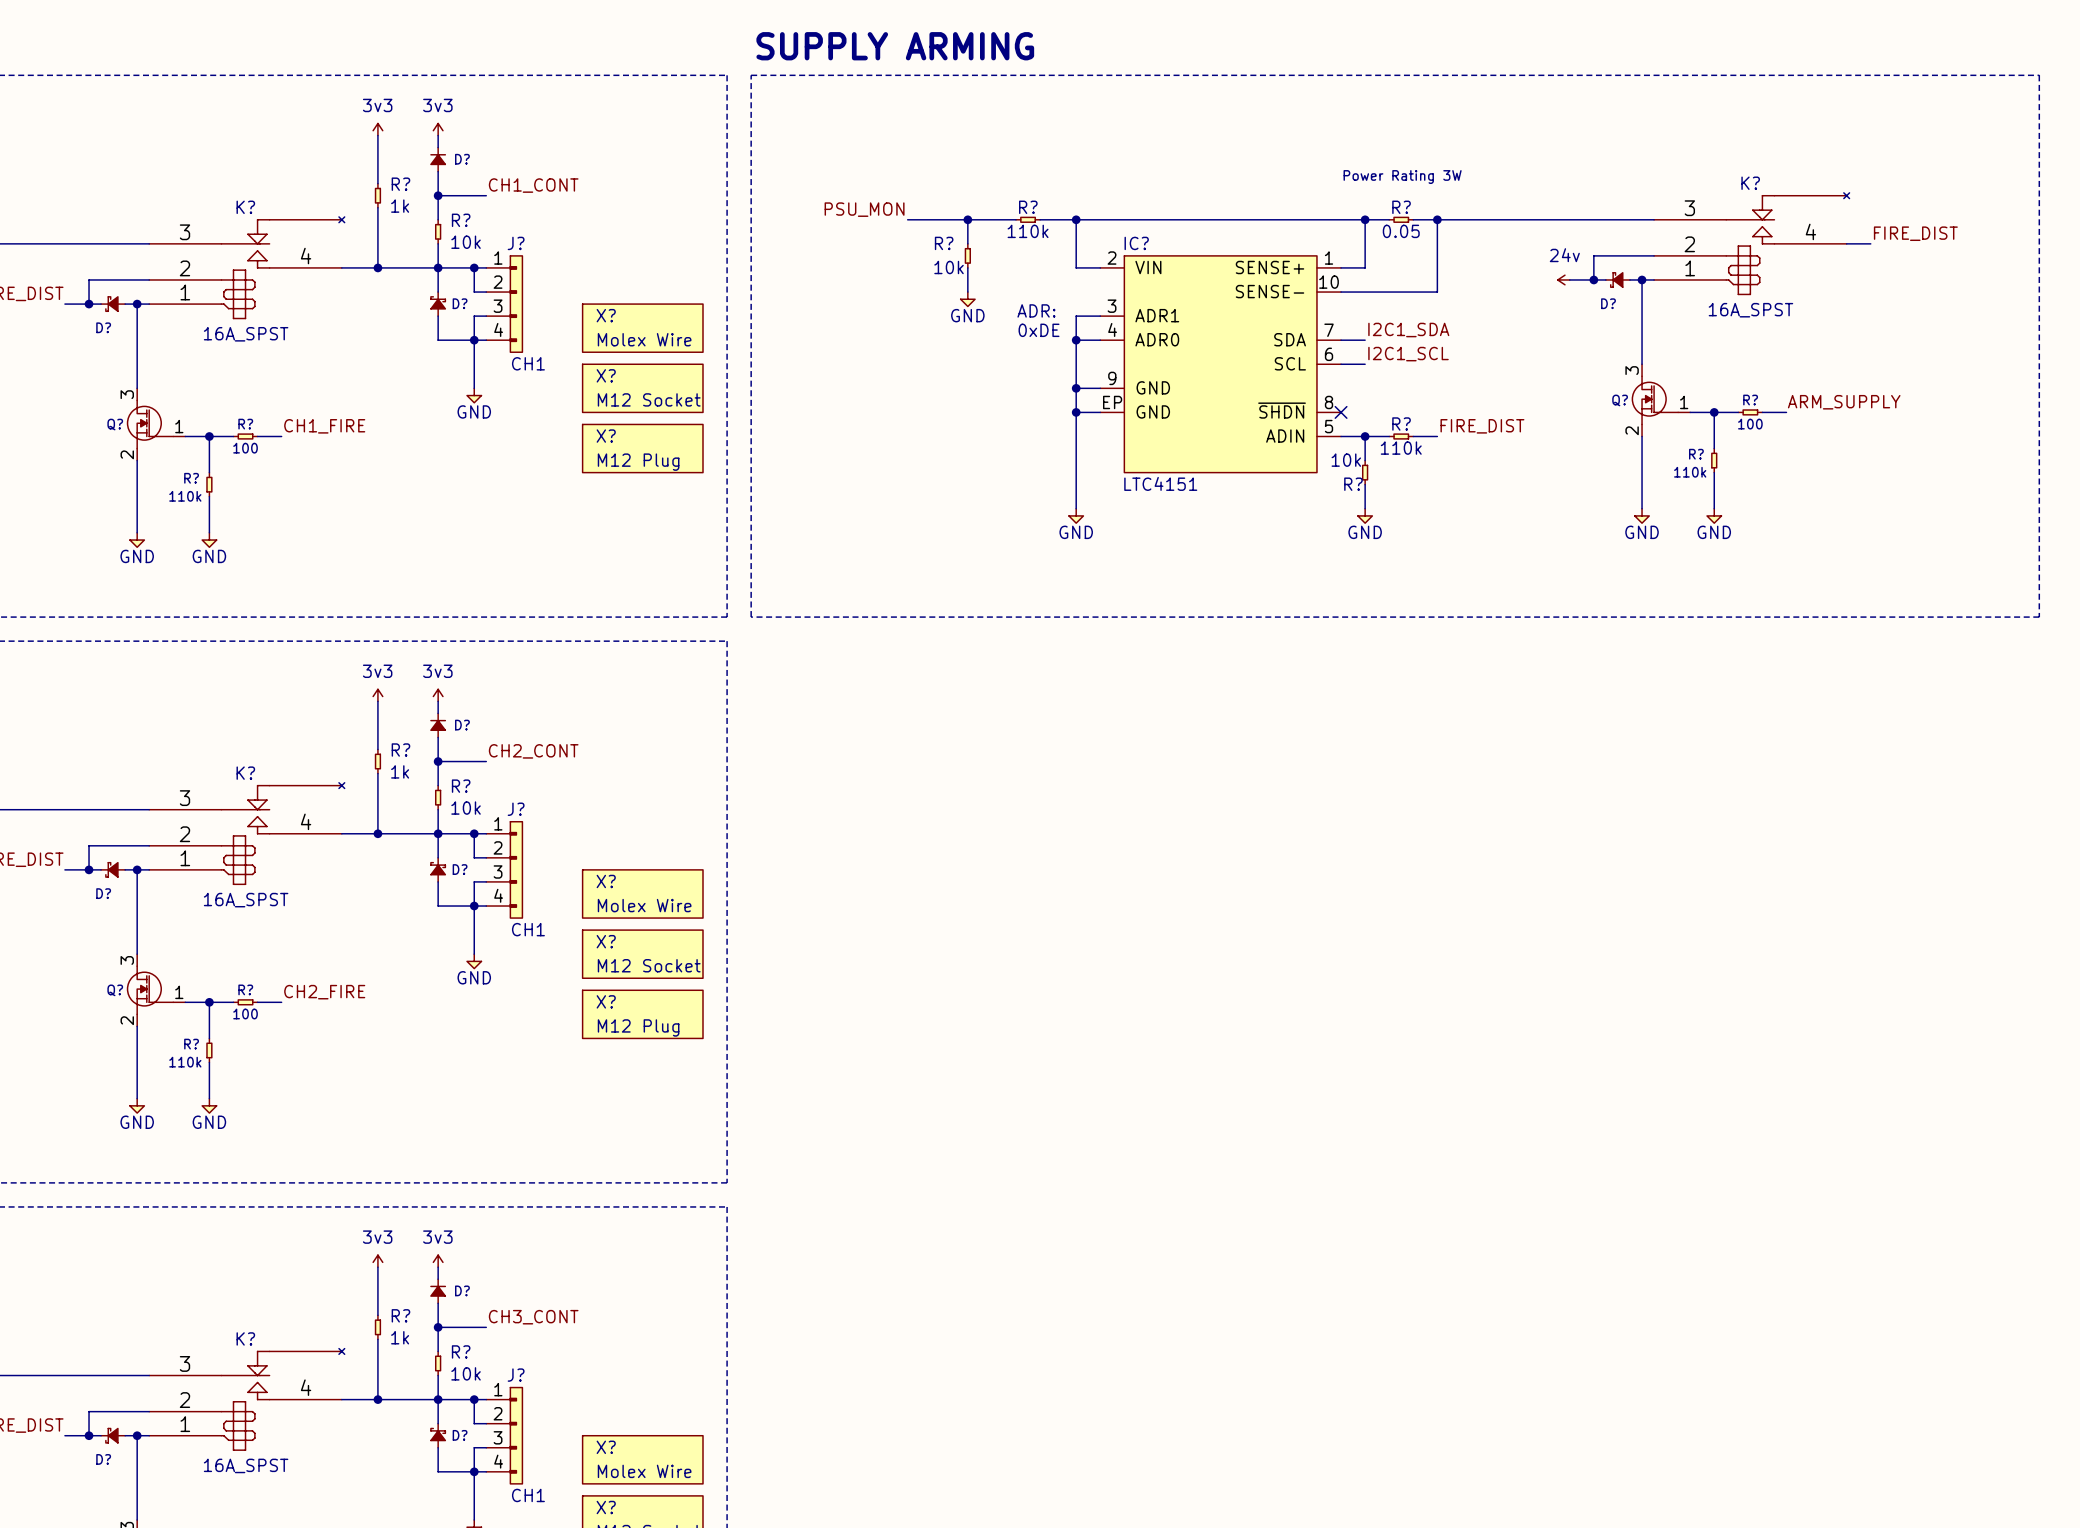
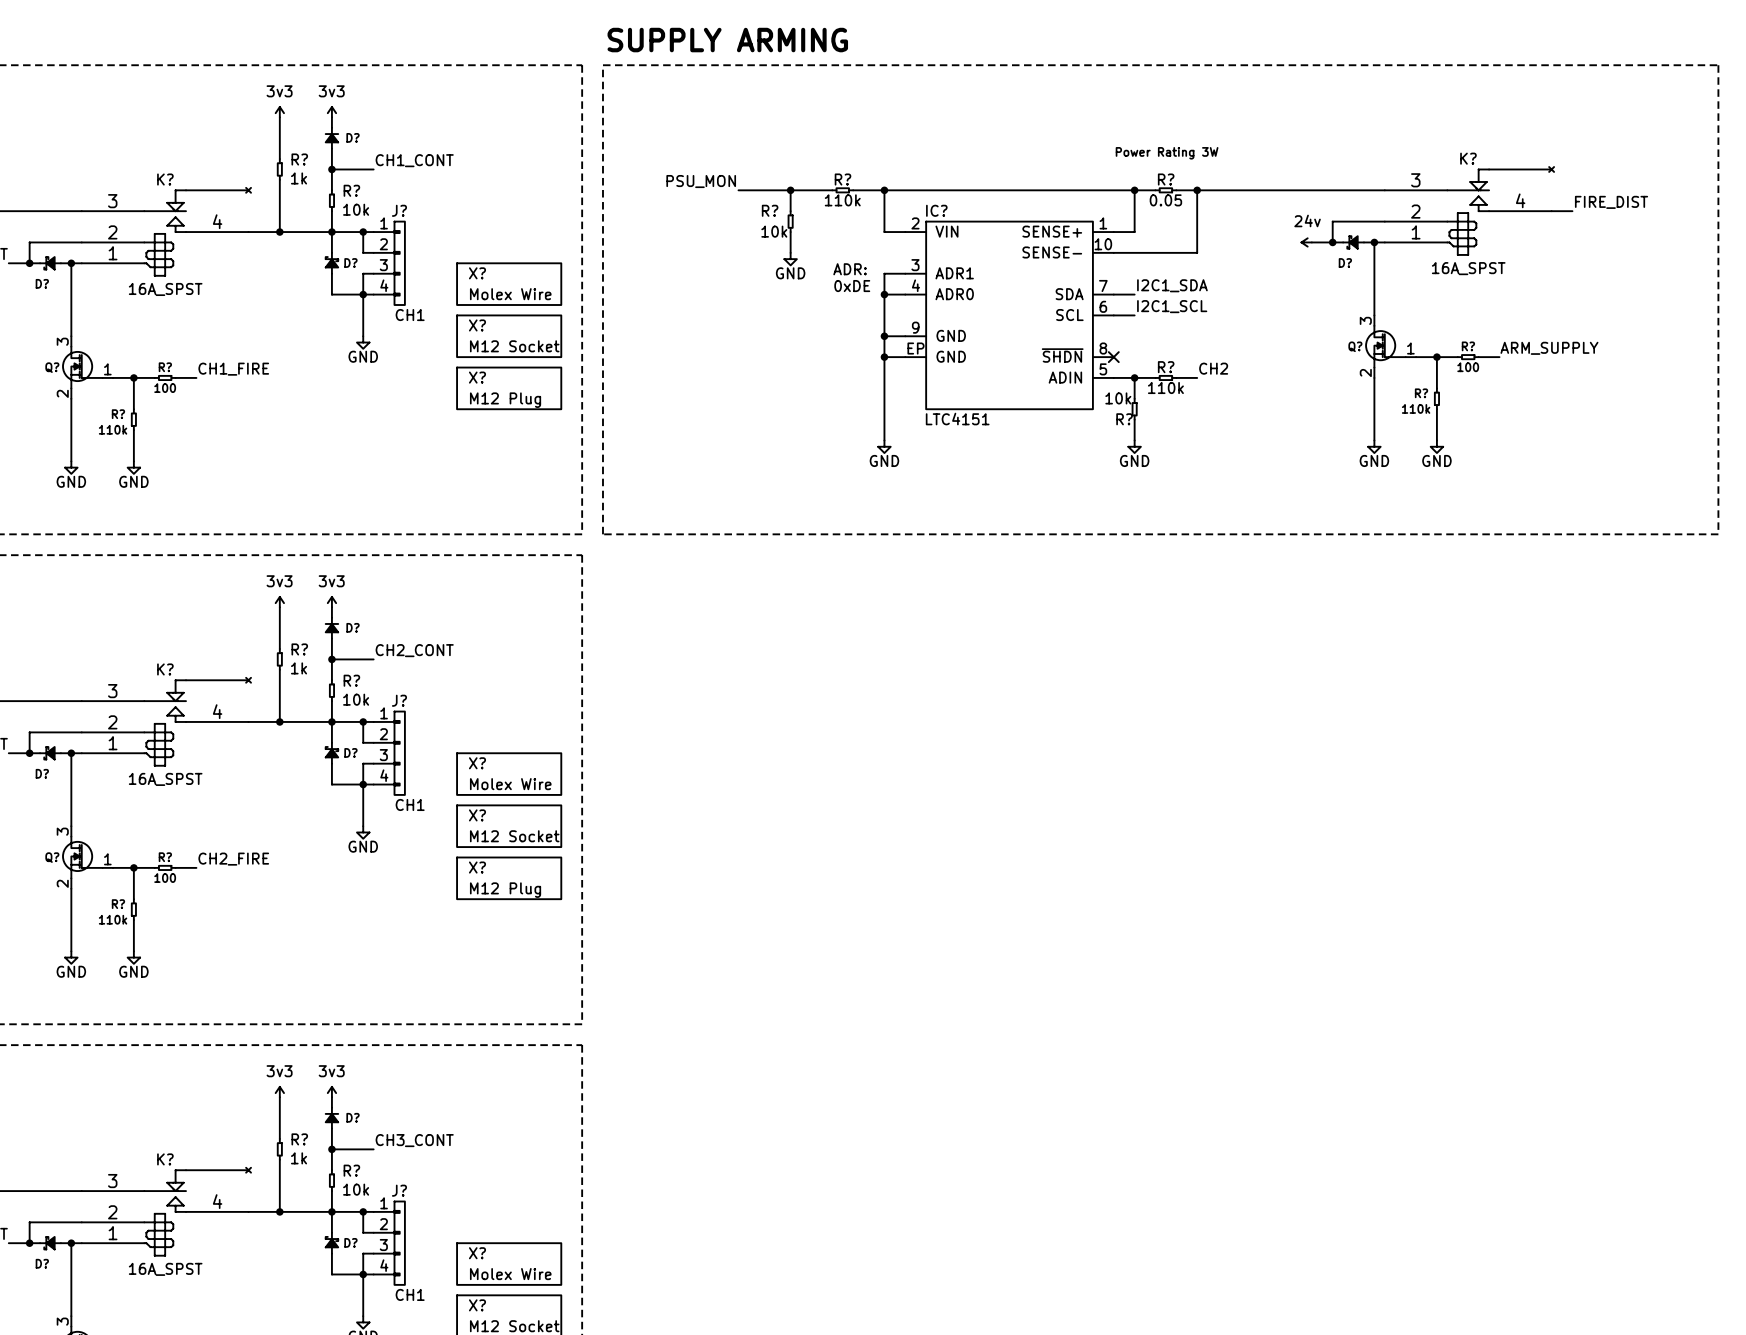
label: FIRE_DIST (1482, 426) -> CH2 (1213, 368)

